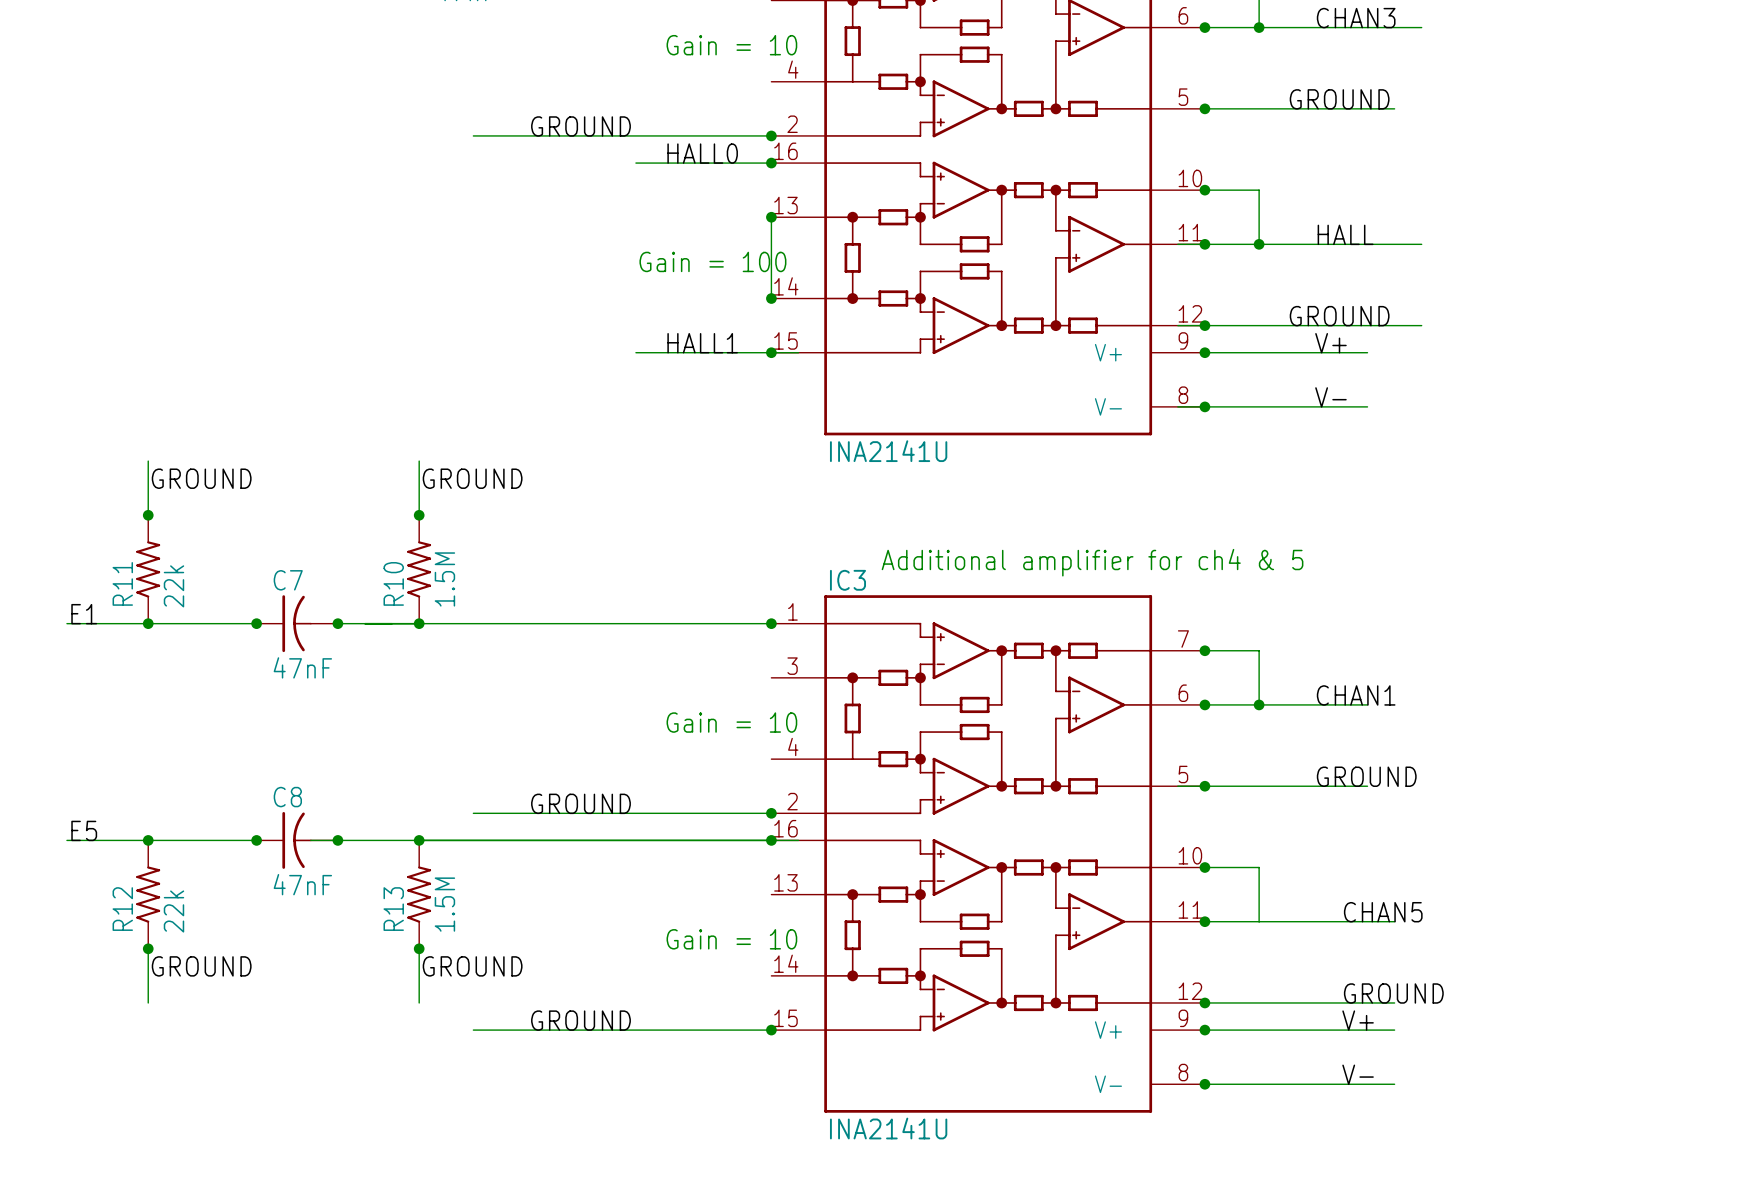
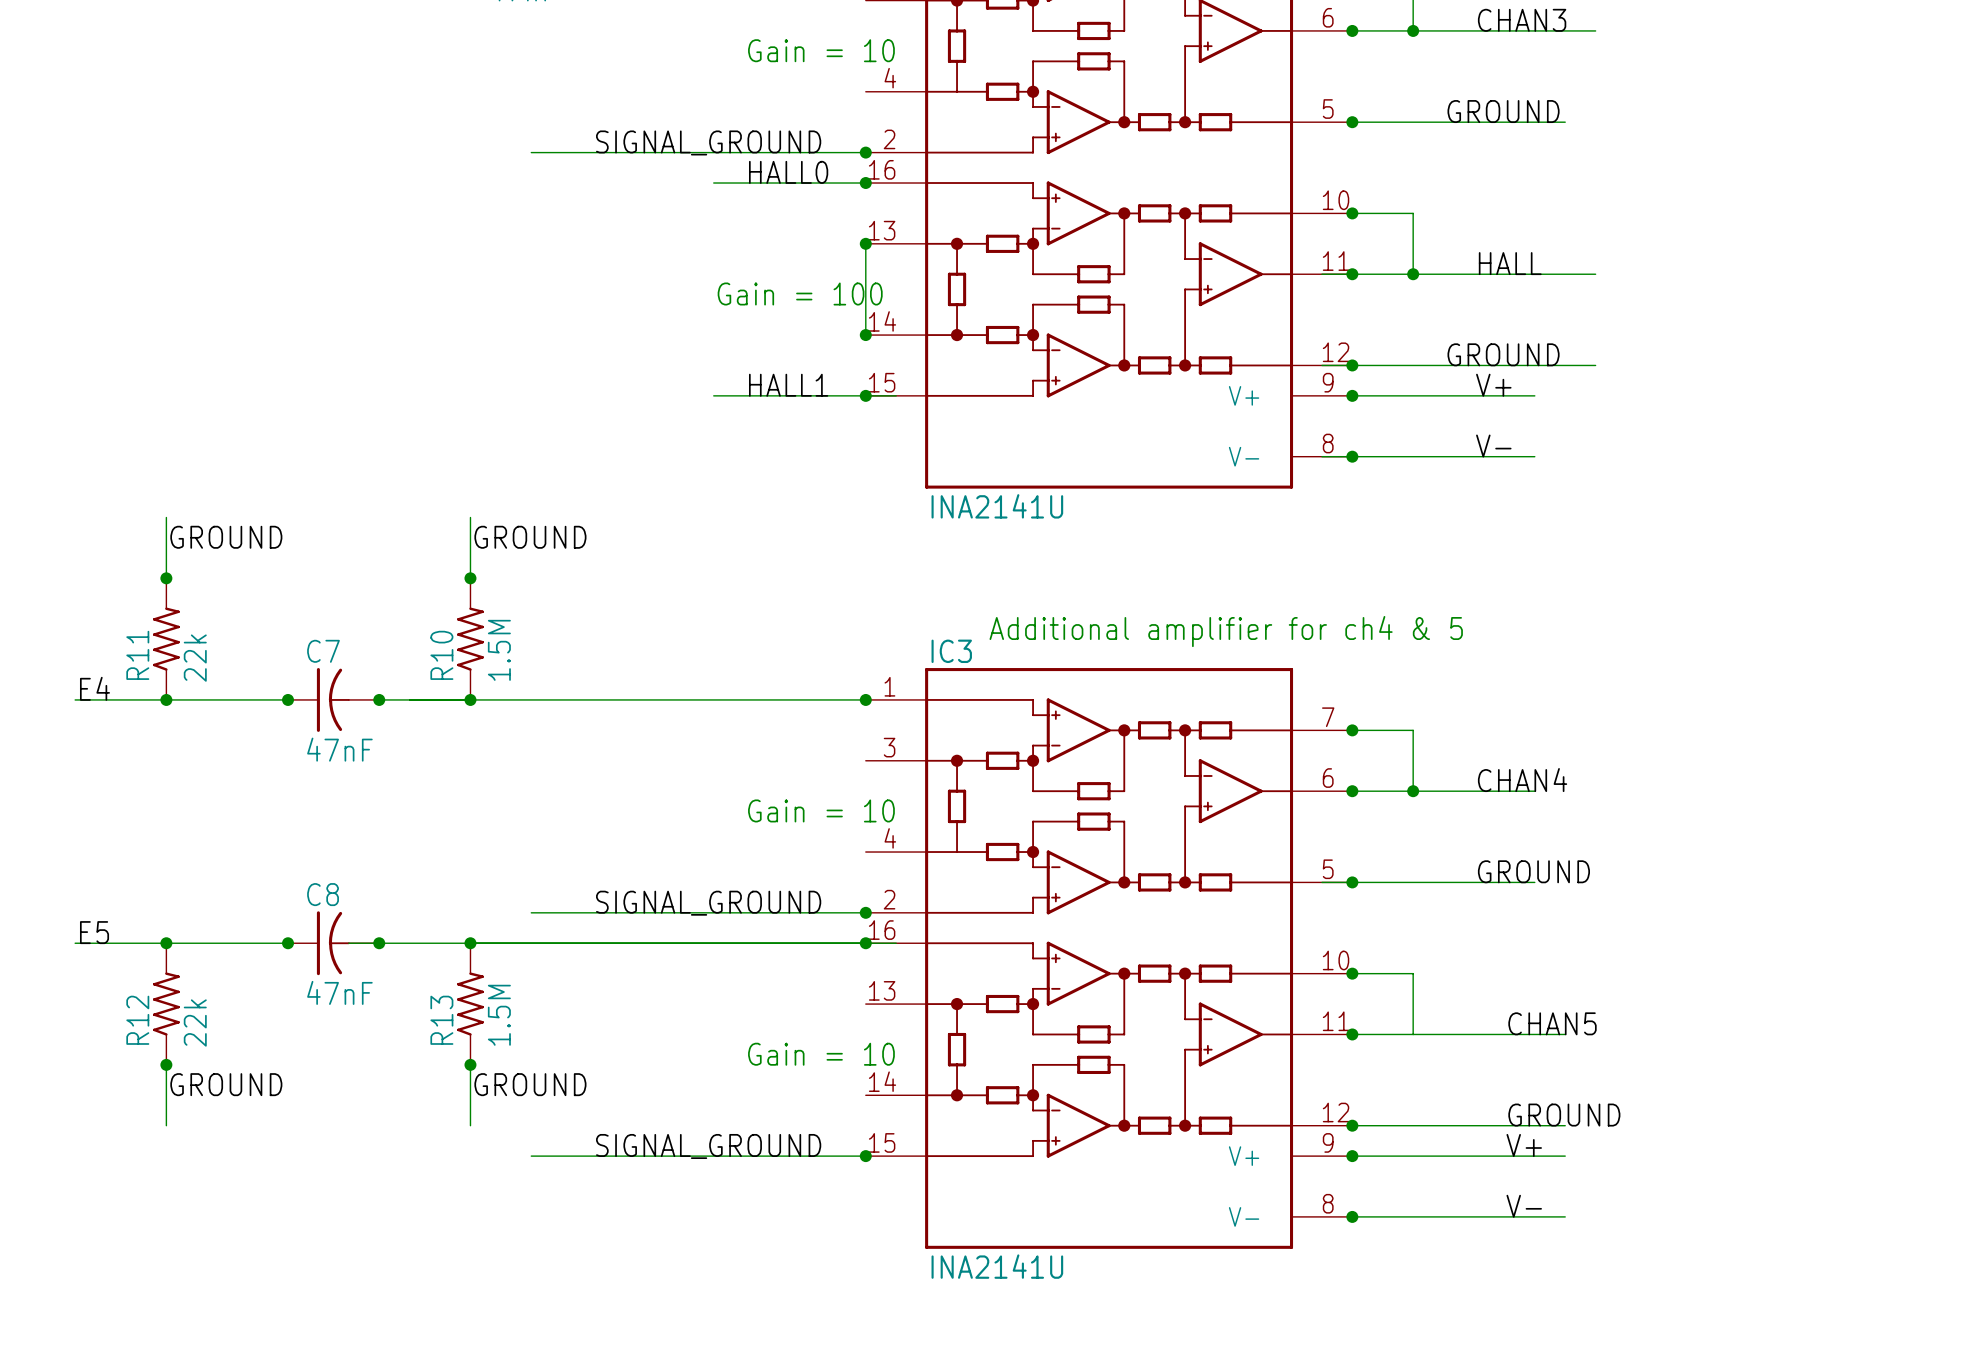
label: GROUND (580, 126) -> SIGNAL_GROUND (708, 142)
label: E1 (84, 614) -> E4 (94, 688)
label: CHAN1 (1356, 695) -> CHAN4 (1522, 780)
label: GROUND (580, 803) -> SIGNAL_GROUND (708, 903)
label: GROUND (580, 1020) -> SIGNAL_GROUND (708, 1146)

